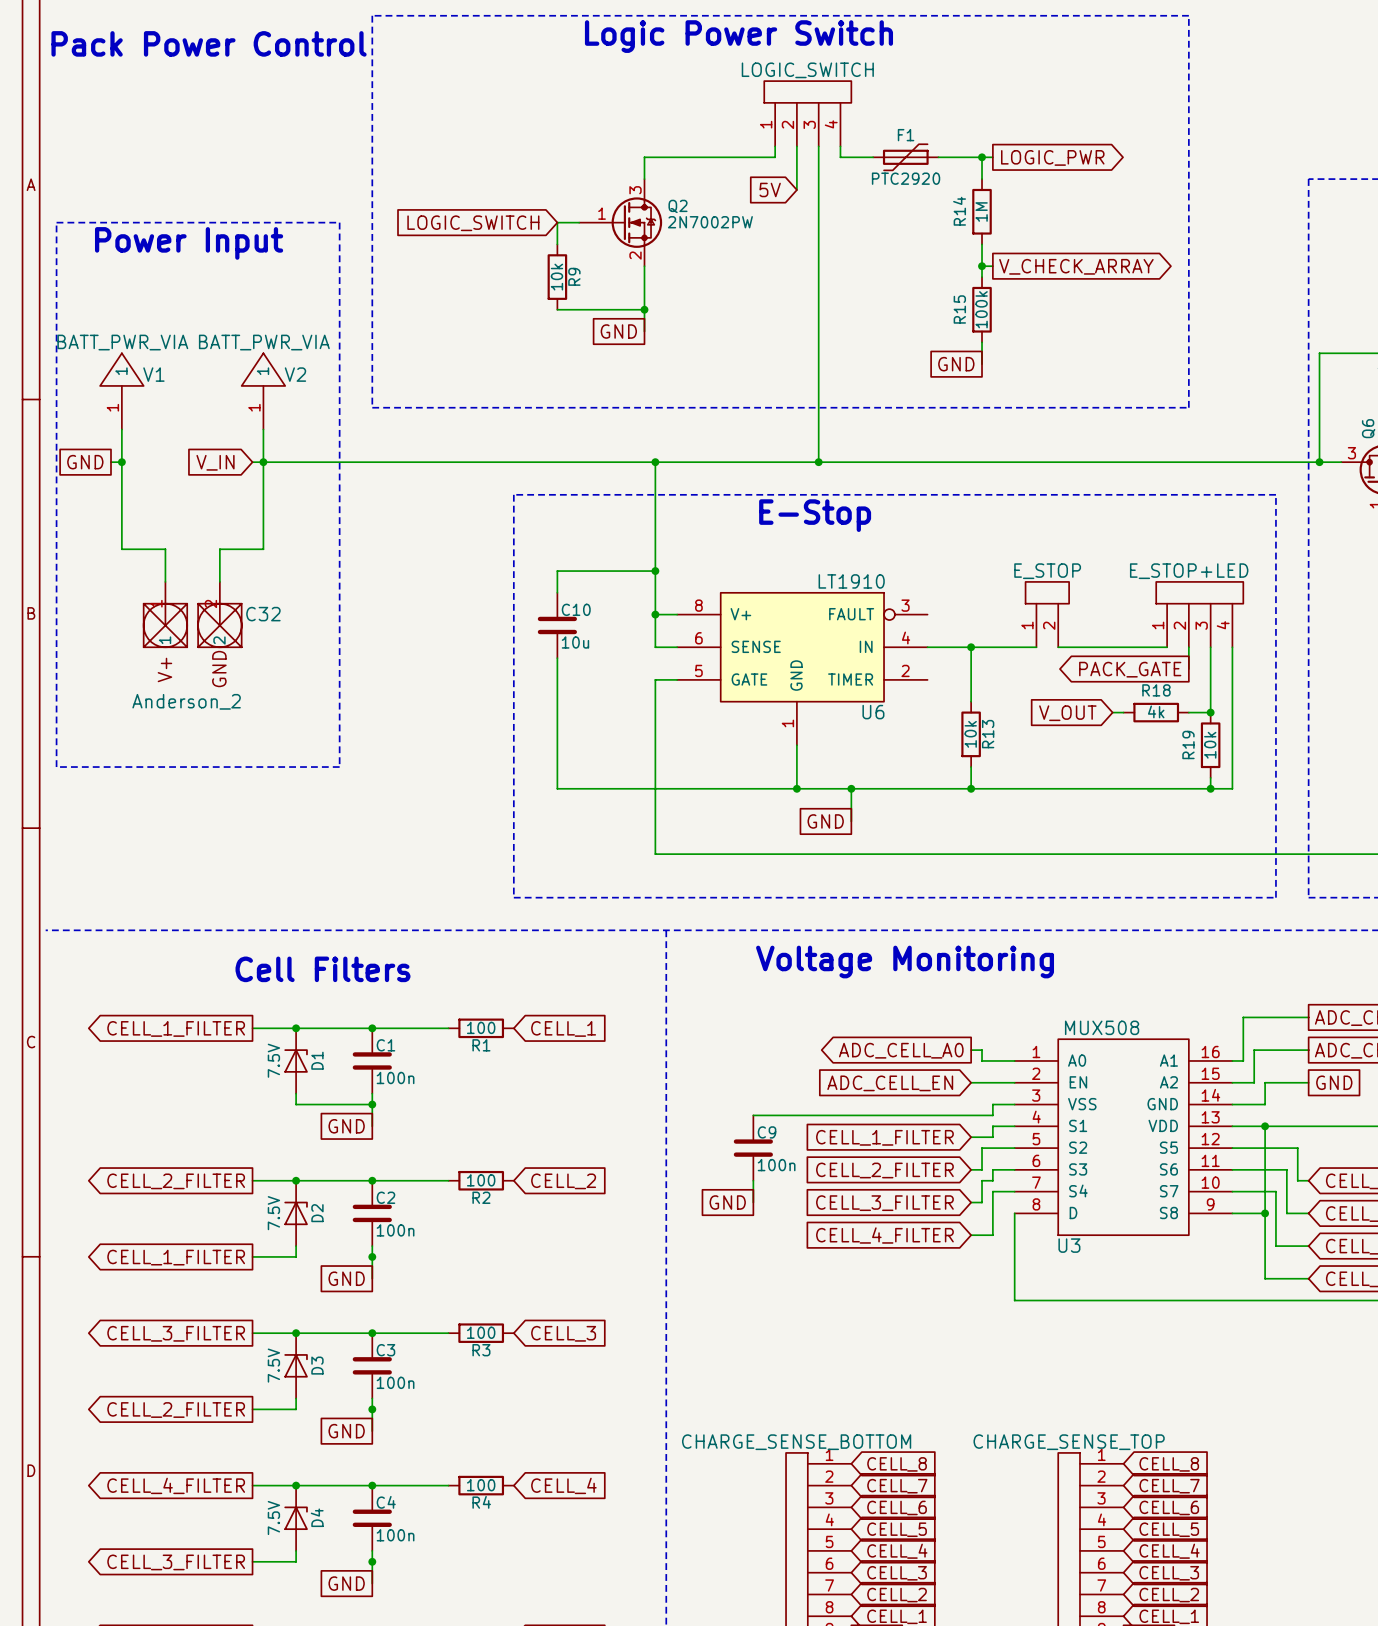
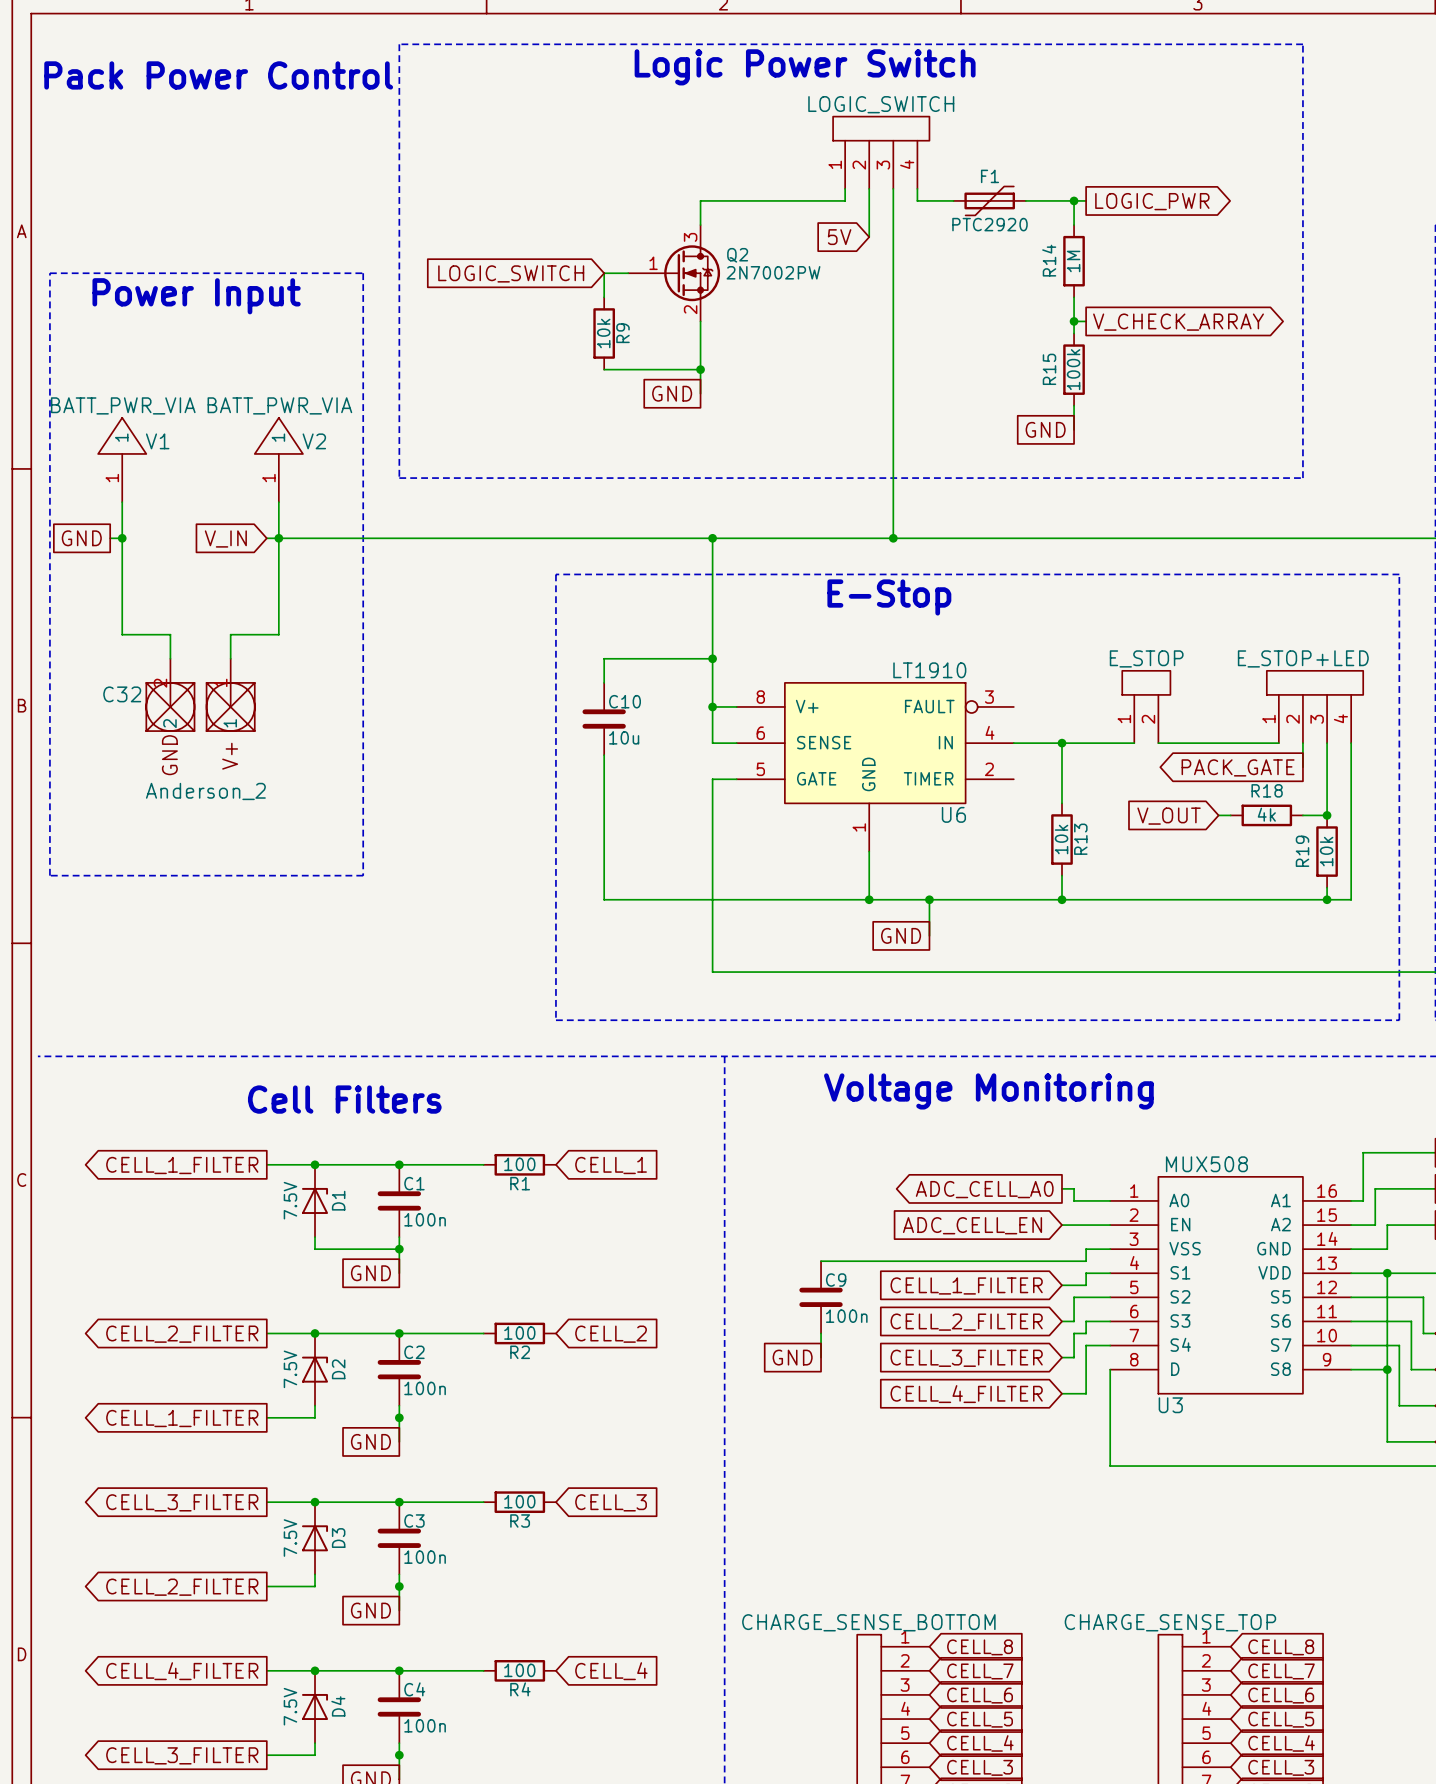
C32 flip: as is (214, 625) -> left-right (176, 706)

